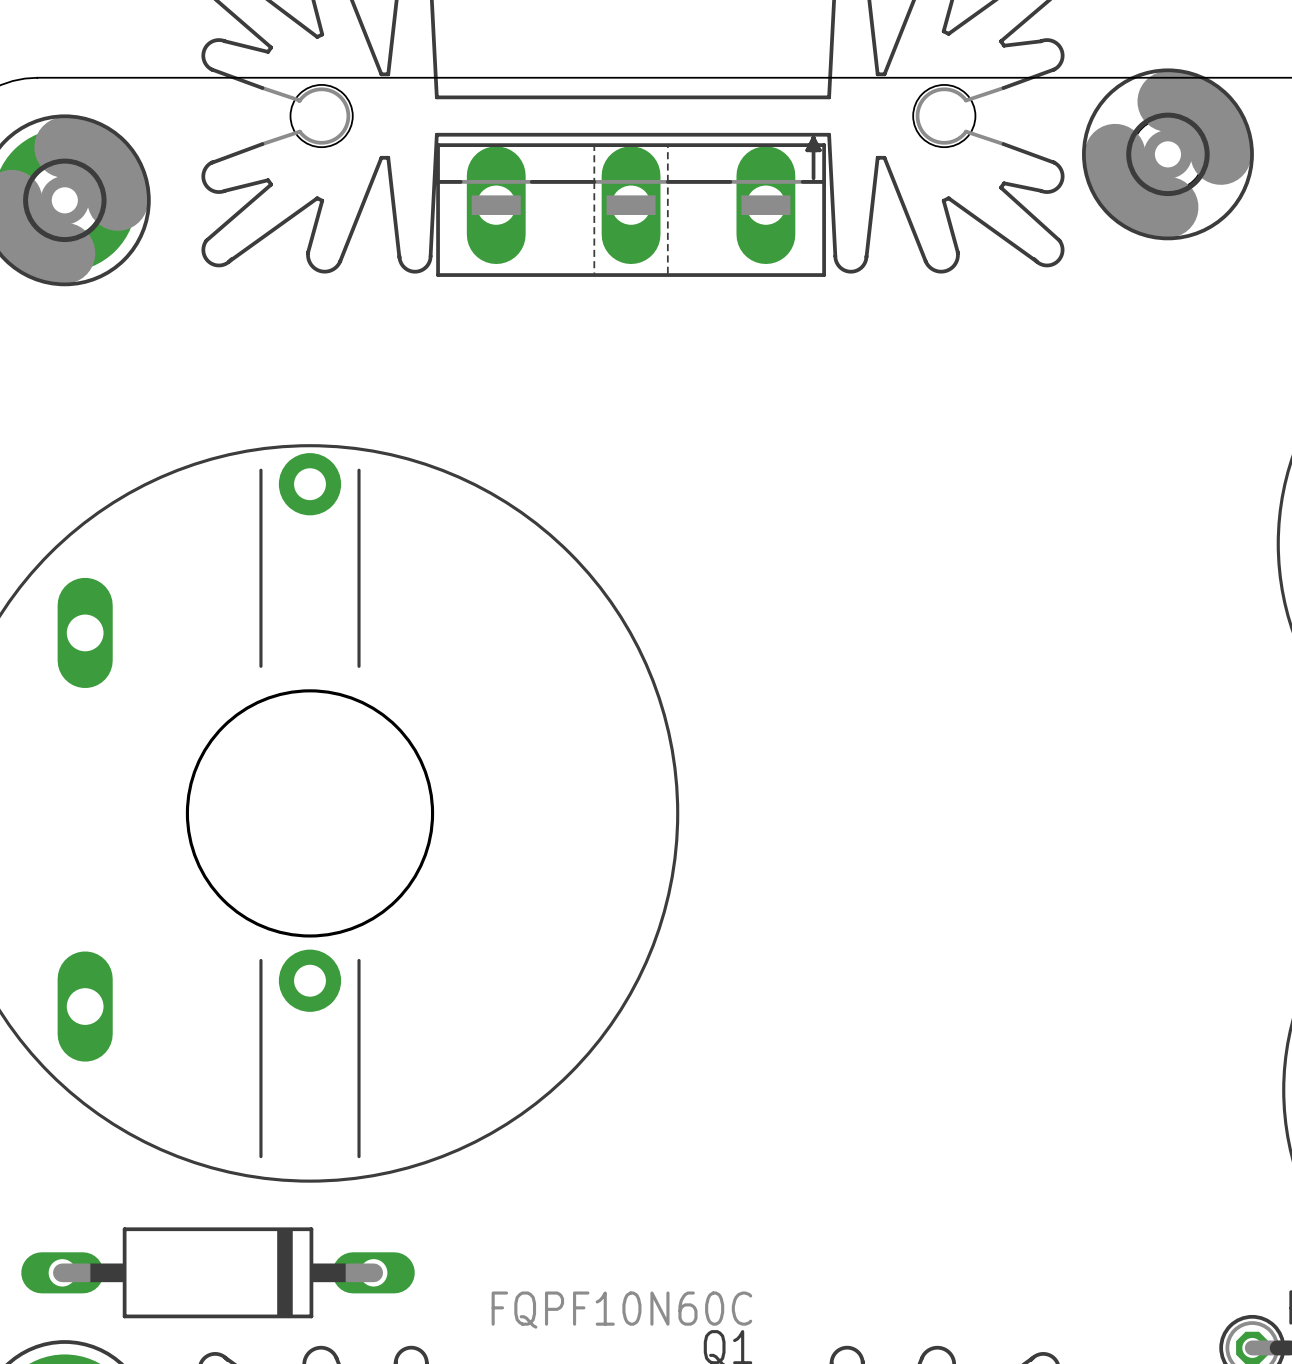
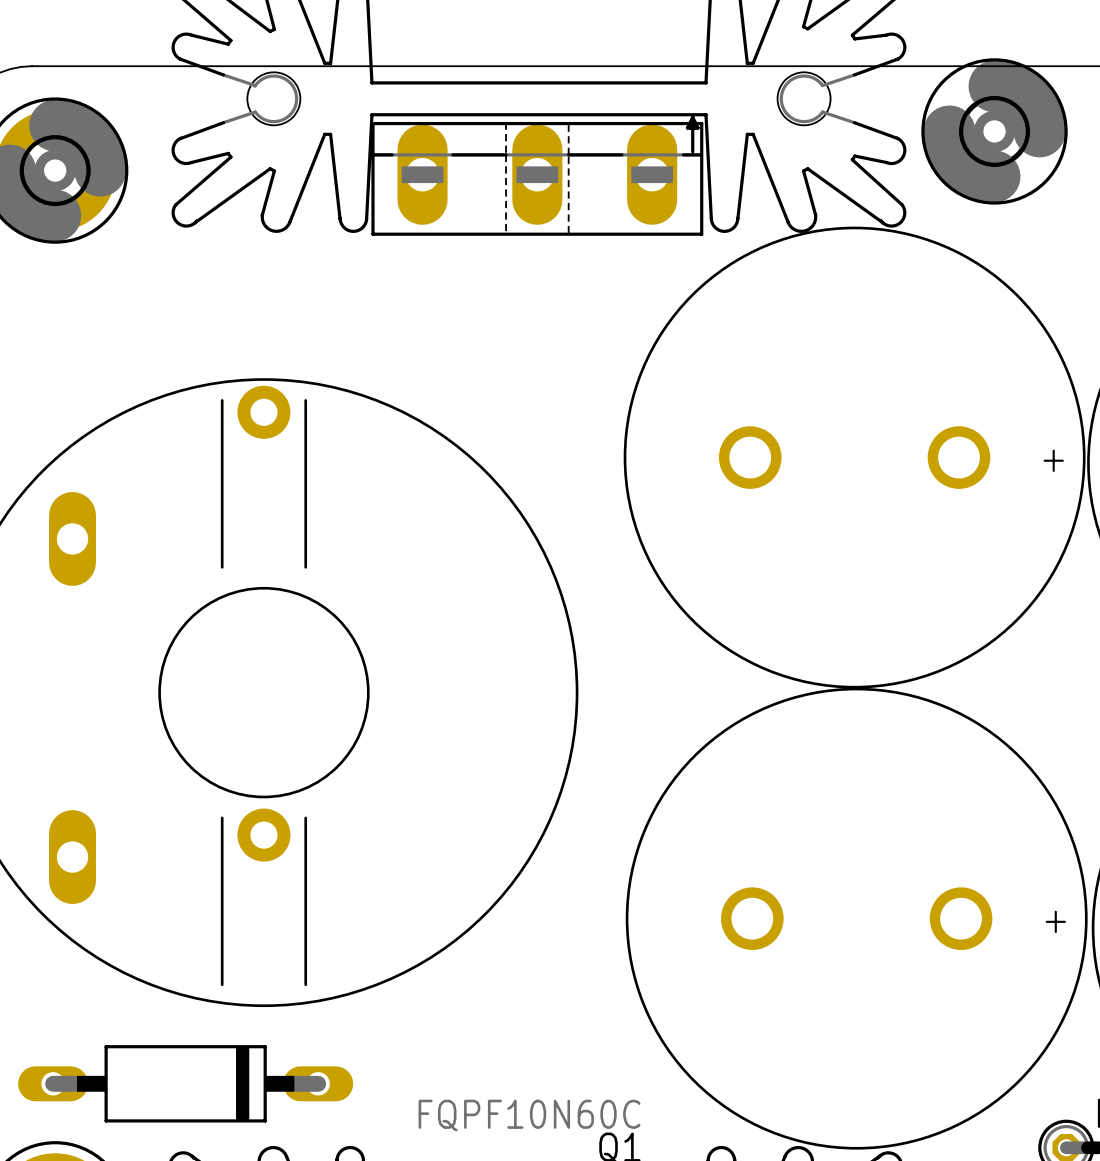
part: none -> (854, 457)
part: none -> (856, 918)

